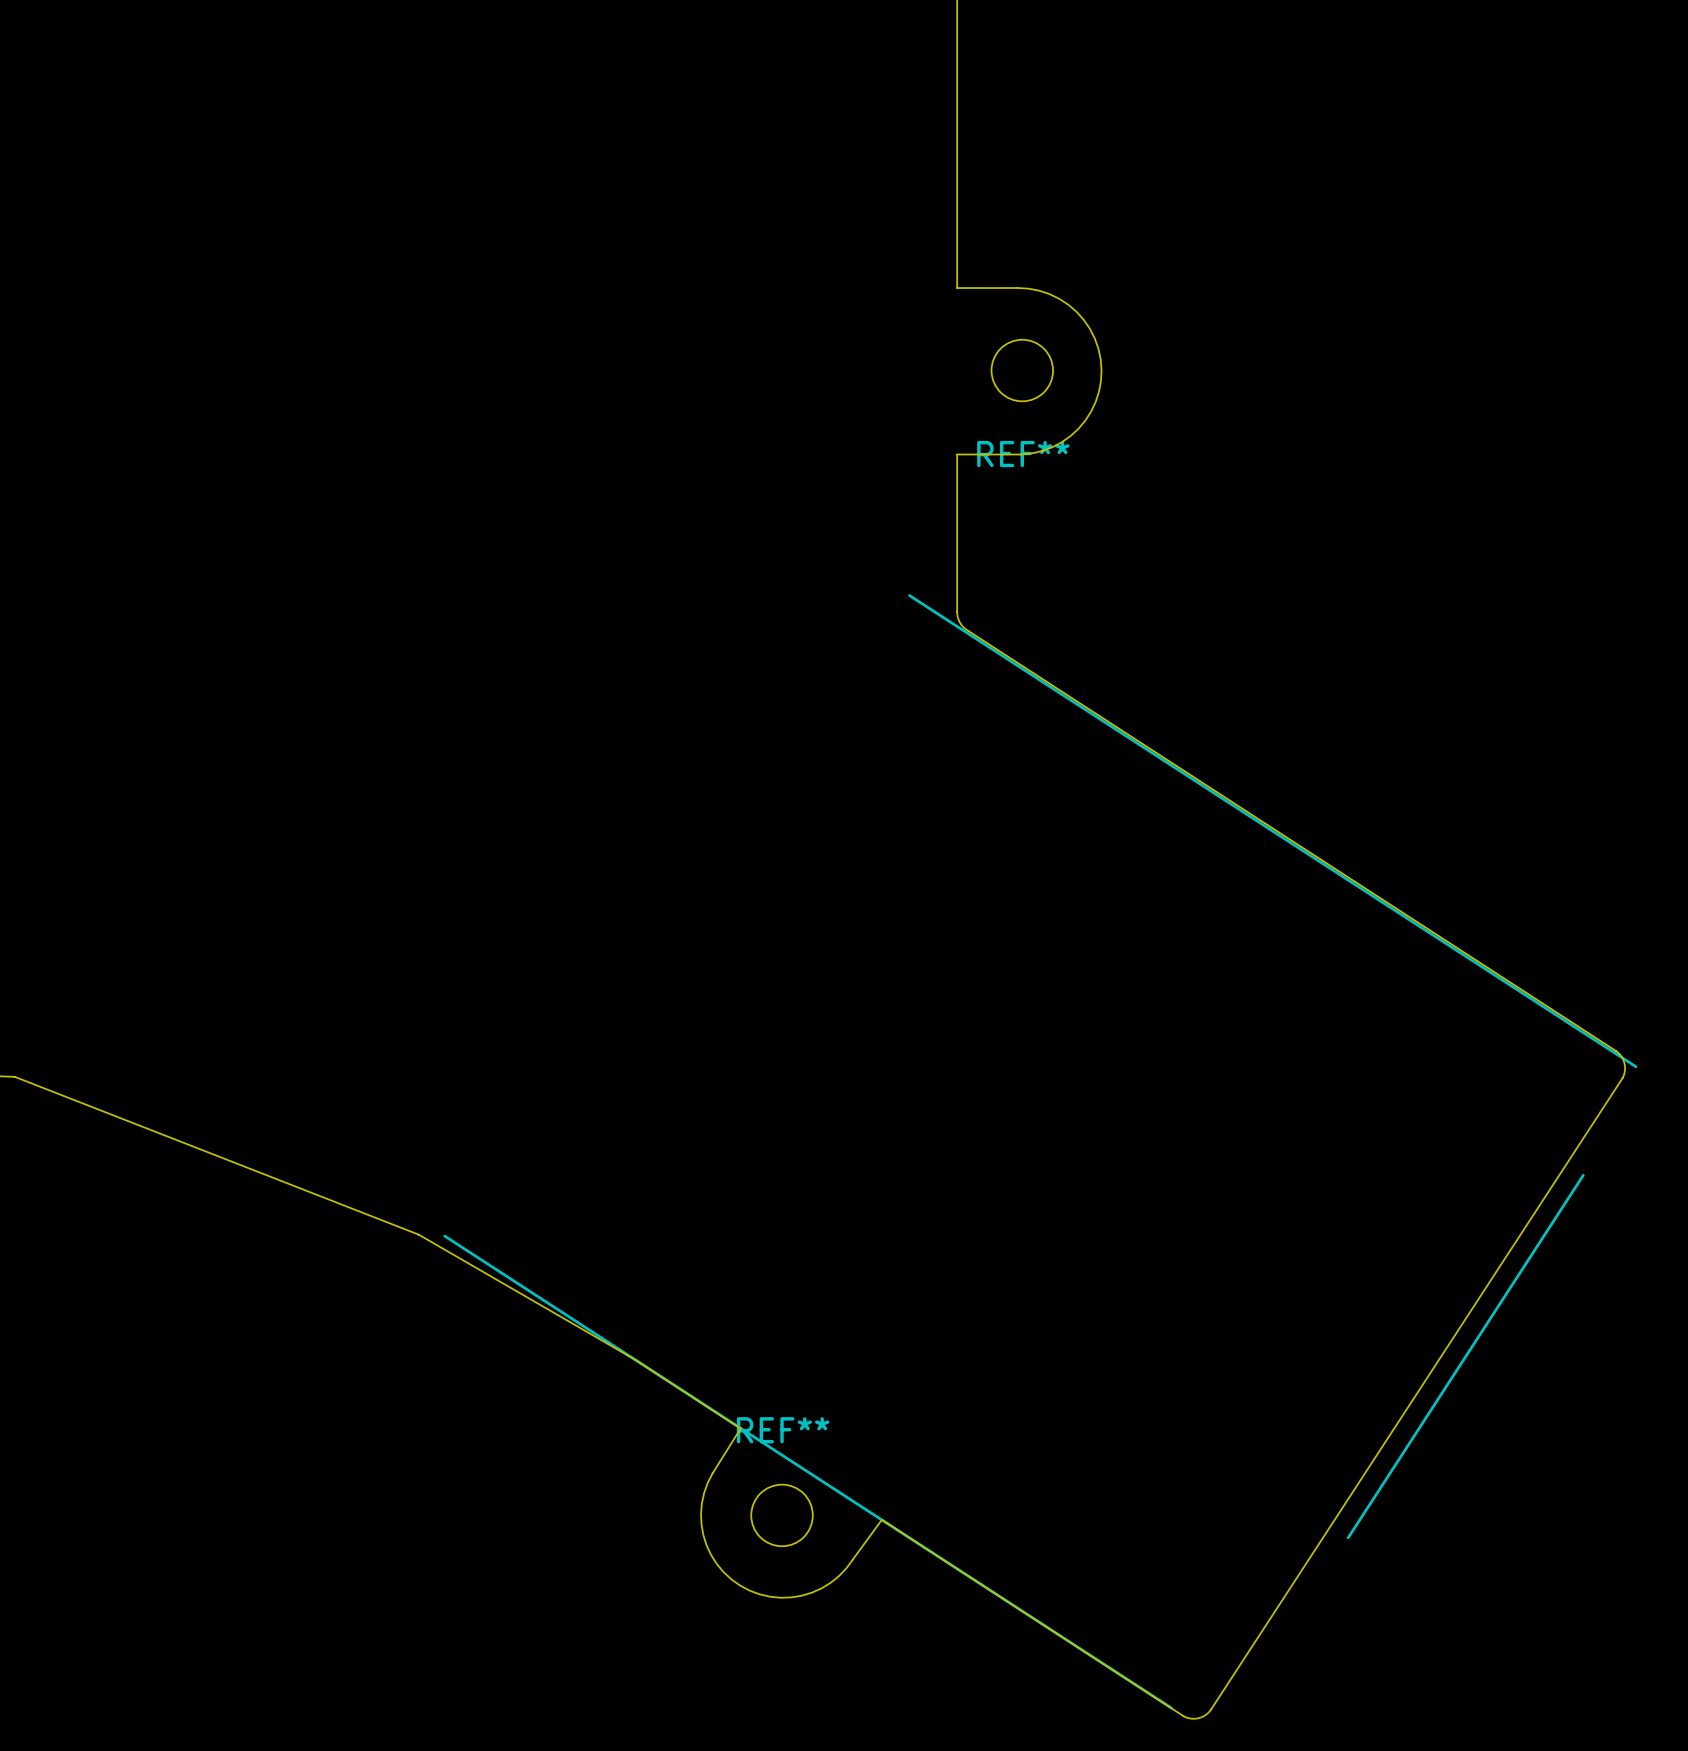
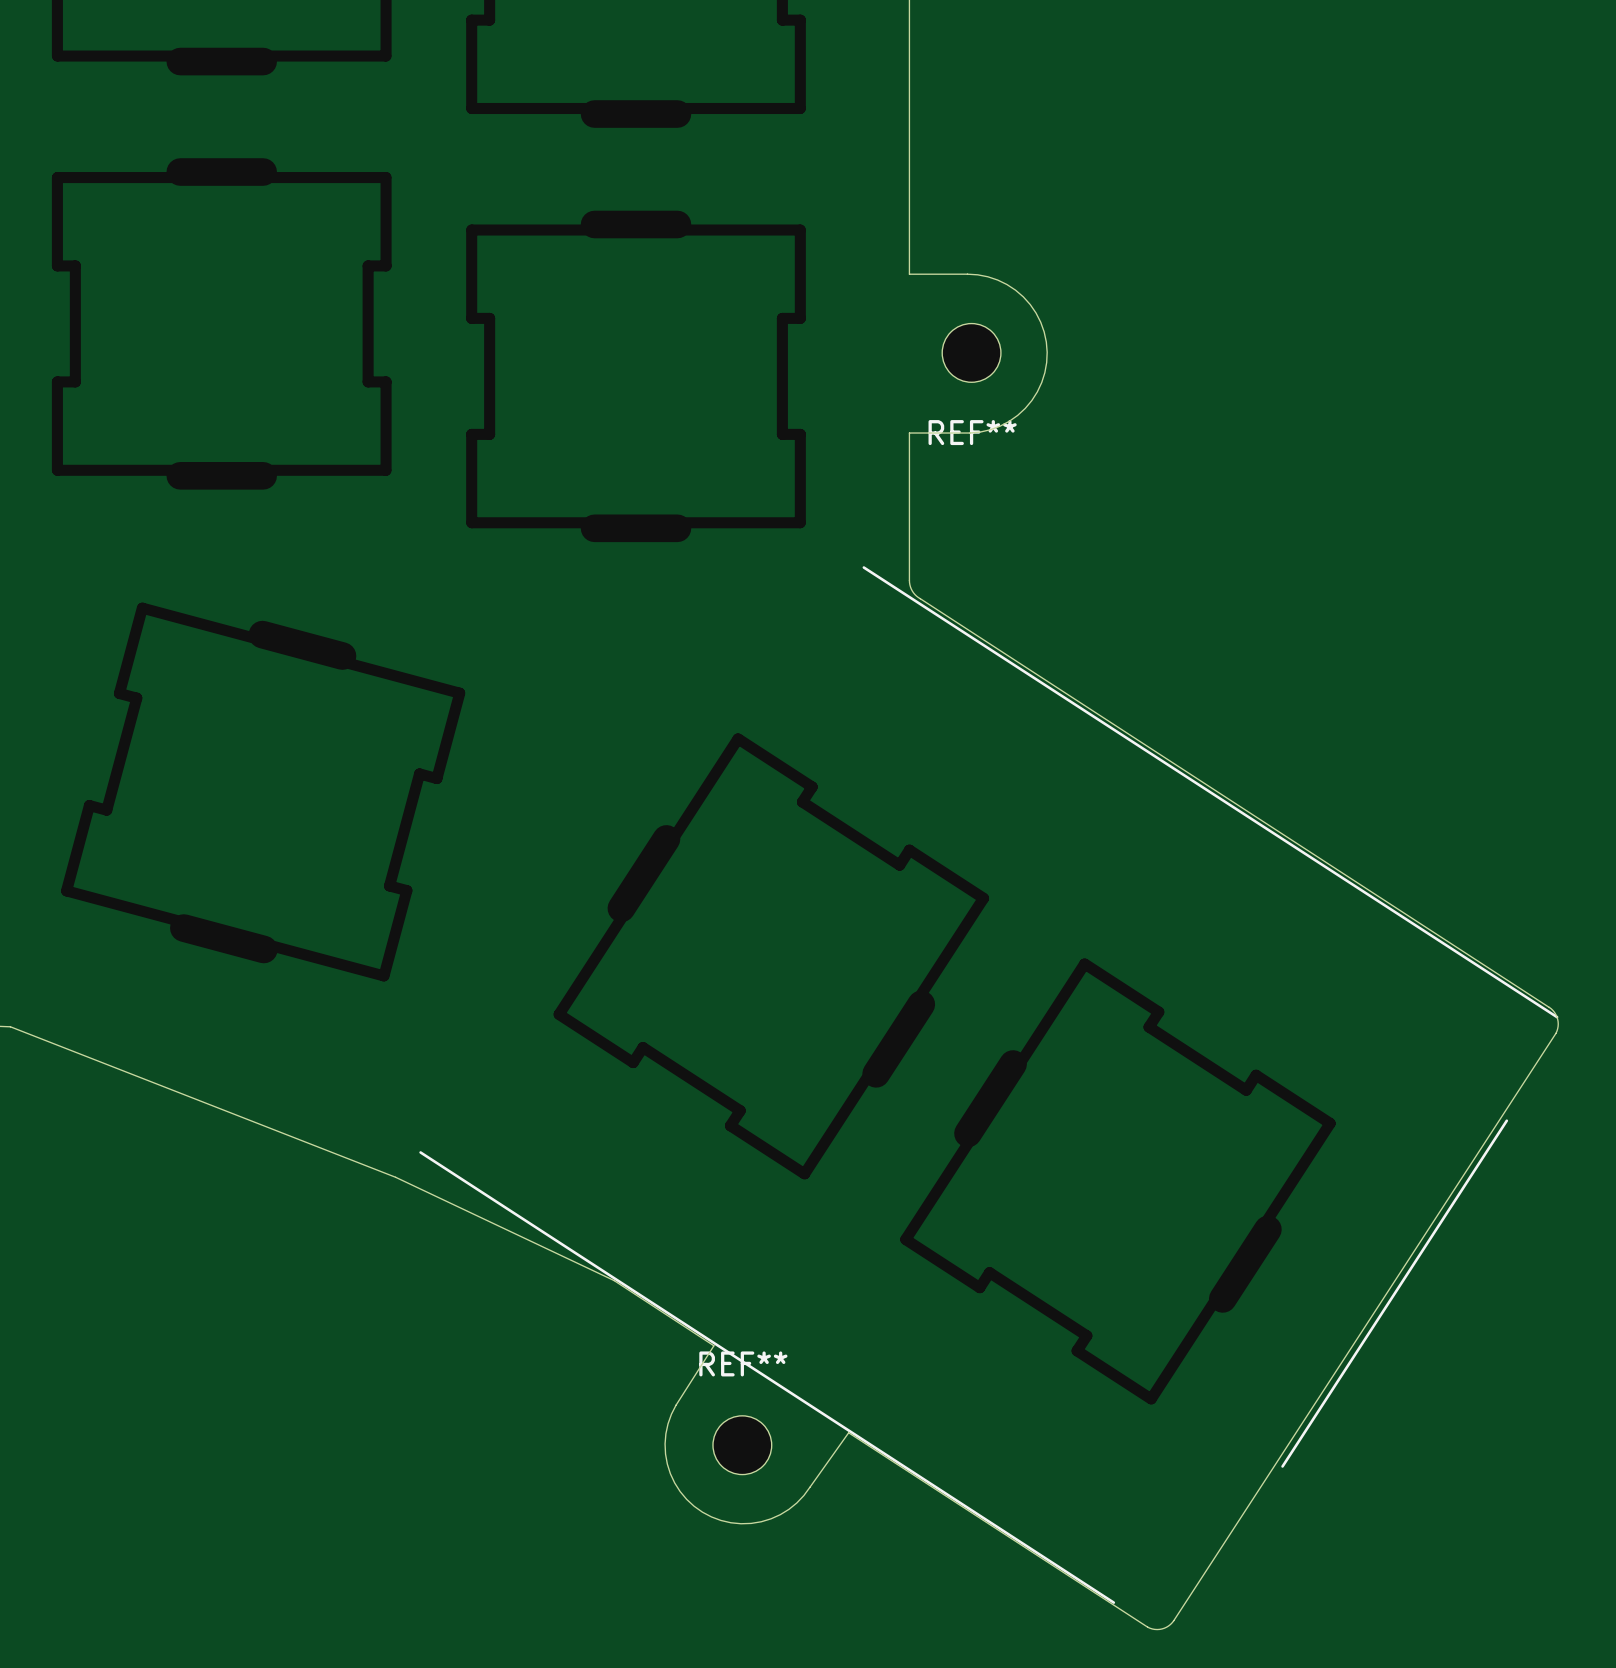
board edge: (957, 609) (959, 621) (966, 629) (1615, 1050) (1622, 1058) (1624, 1070) (1622, 1078) (1205, 1714) (1193, 1718) (1183, 1716) (881, 1519) (852, 1559) -> (909, 580) (912, 591) (918, 597) (1549, 1007) (1555, 1014) (1558, 1026) (1555, 1033) (1173, 1620) (1166, 1627) (1157, 1629) (1147, 1627) (848, 1432) (809, 1487)
board edge: (418, 1234) (636, 1360) (740, 1428) (712, 1473) -> (395, 1177) (614, 1280) (713, 1345) (676, 1405)
line: (444, 1236) (1171, 1707) -> (420, 1152) (1113, 1602)

